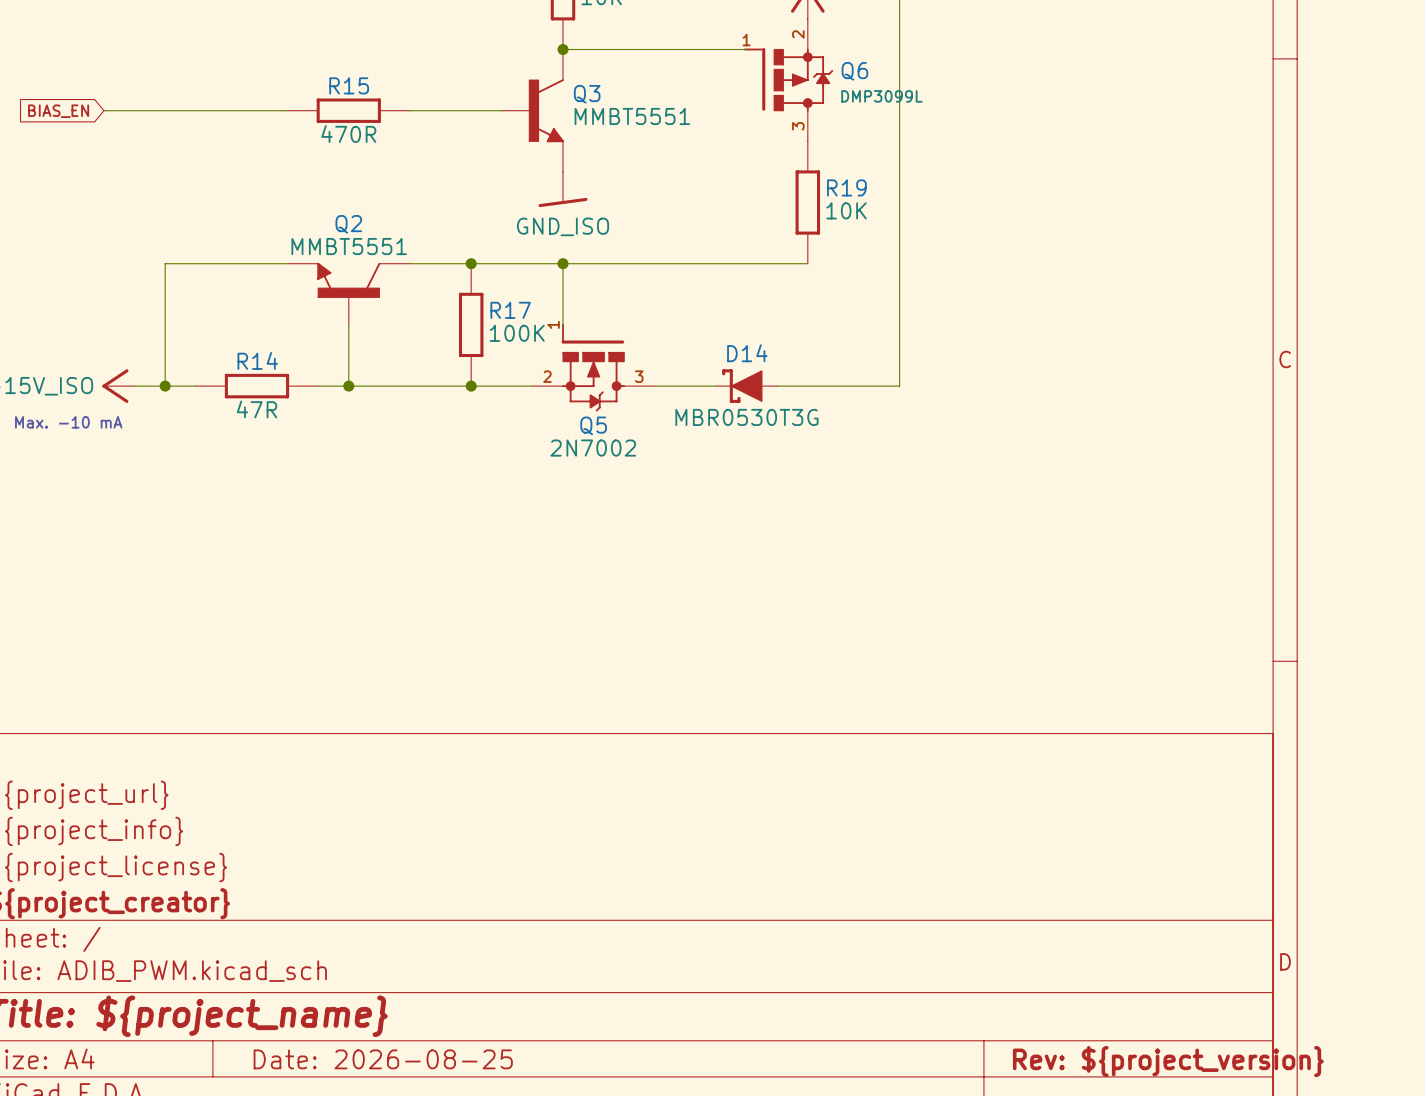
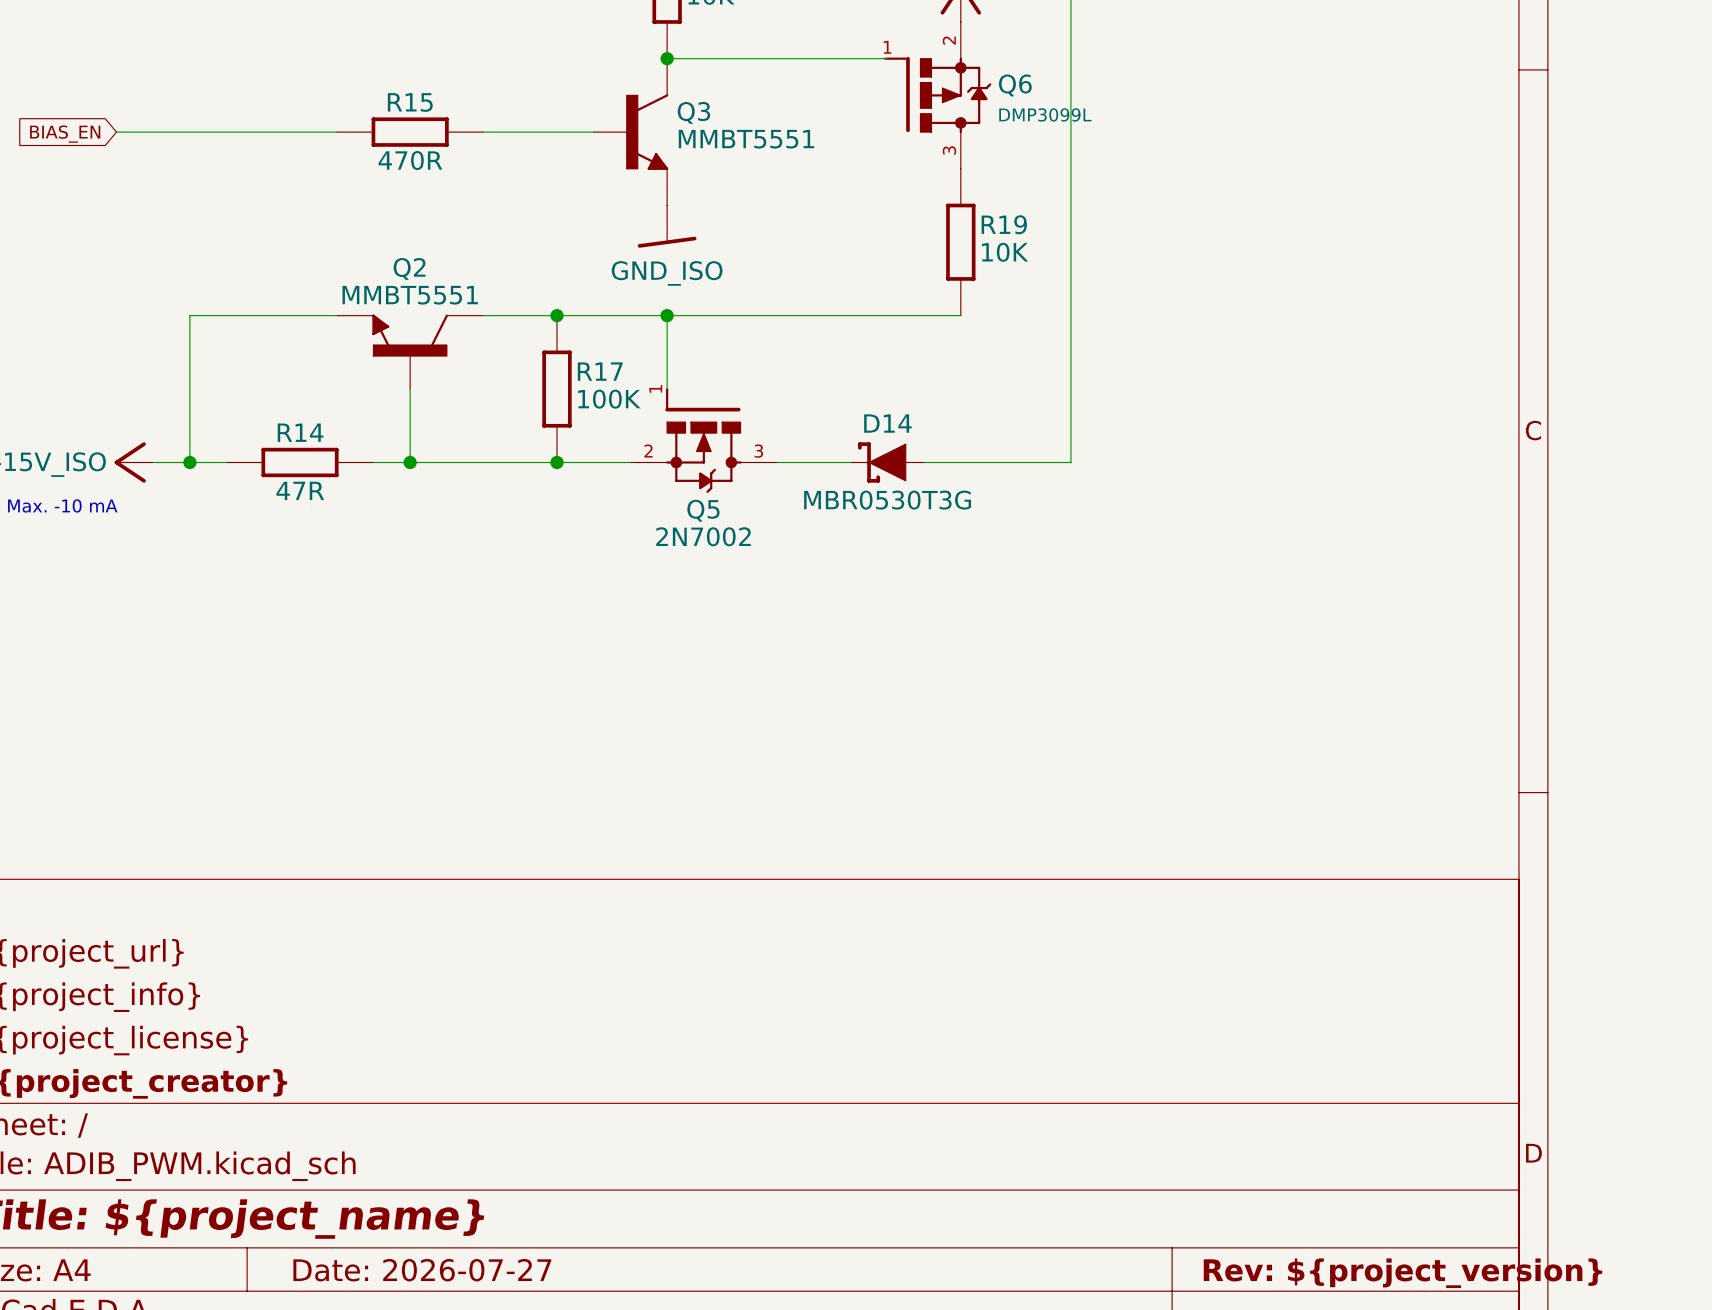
title block: Date: 2026-08-25 (383, 1059) -> Date: 2026-07-27 (422, 1270)

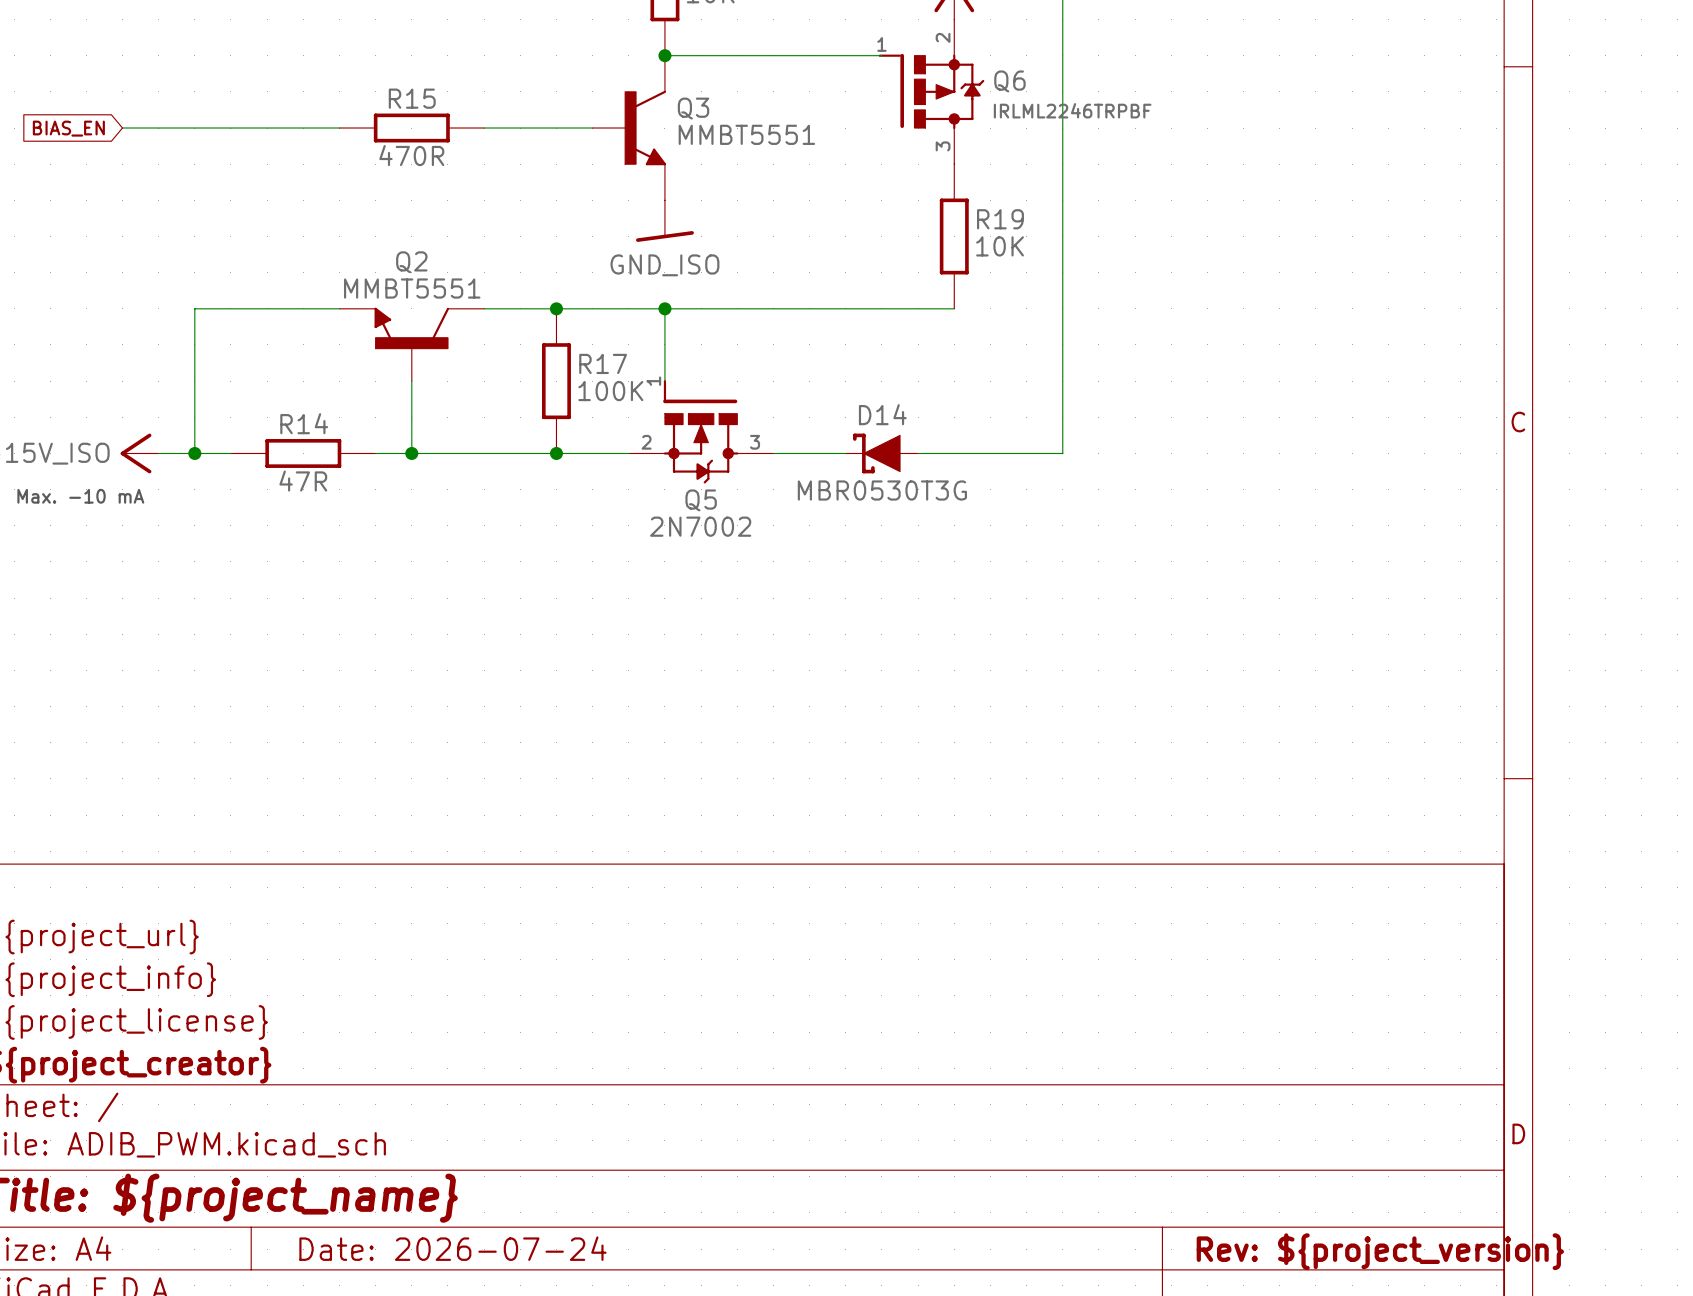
Q6 value: DMP3099L (1045, 114) -> IRLML2246TRPBF (1072, 110)
title block: Date: 2026-07-27 (422, 1270) -> Date: 2026-07-24 (452, 1248)

